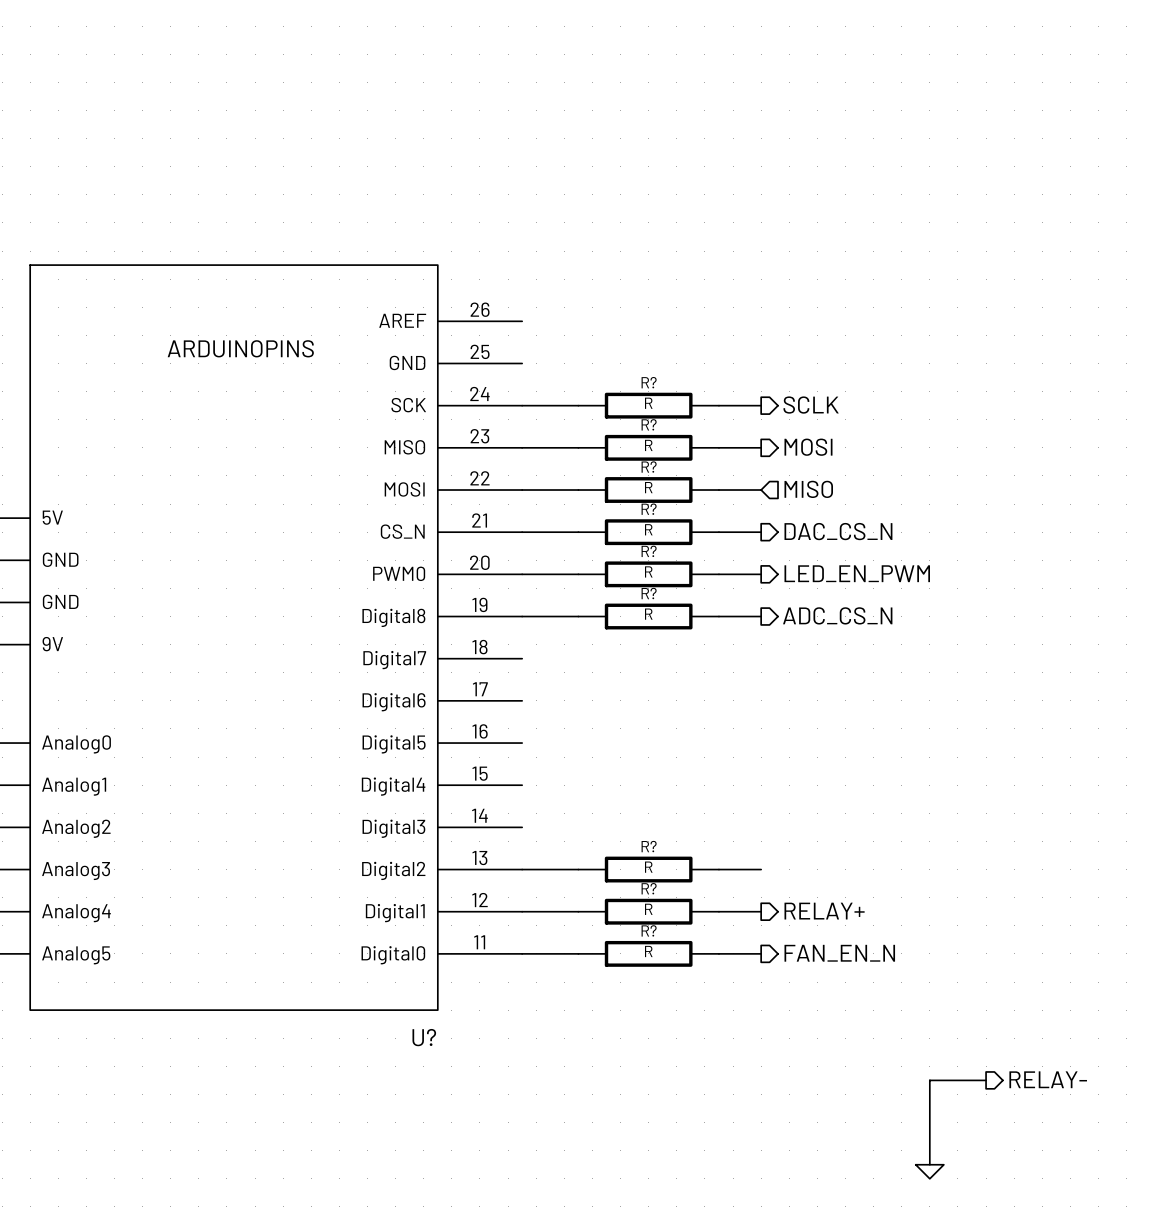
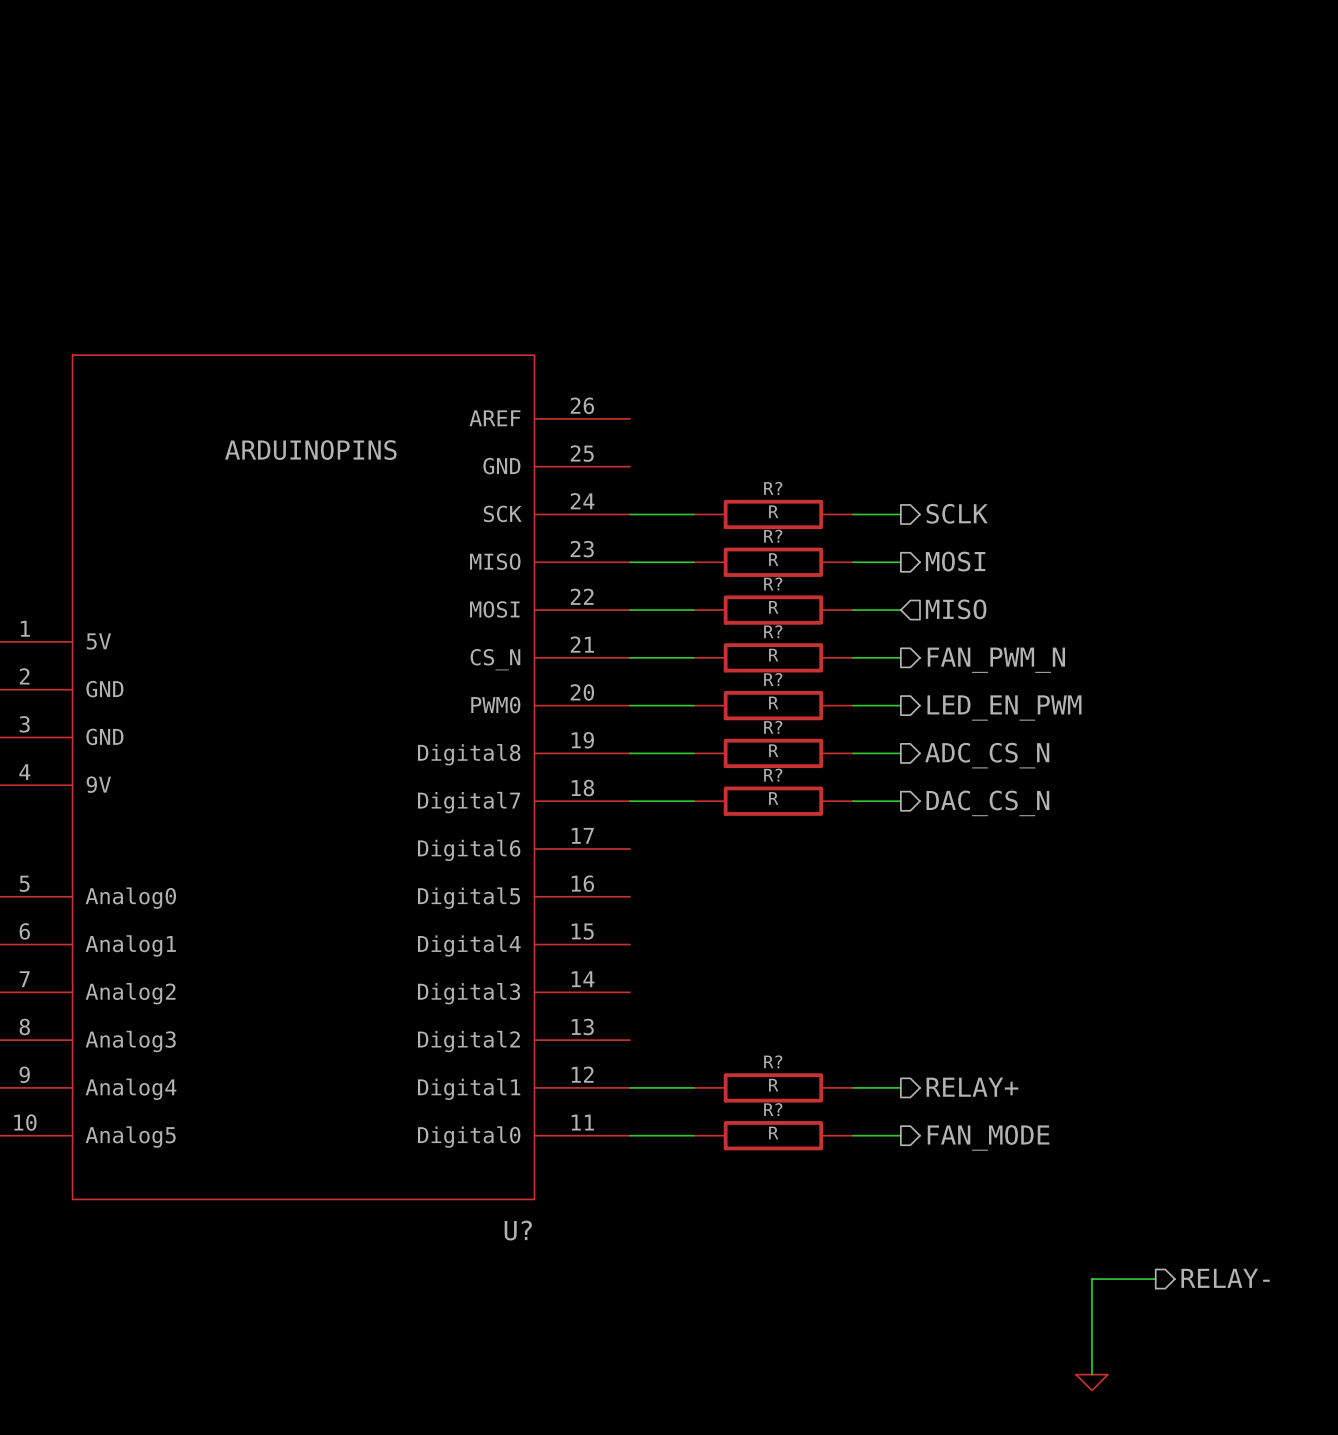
hierarchical label: DAC_CS_N (838, 531) -> FAN_PWM_N (996, 660)
hierarchical label: none -> DAC_CS_N (987, 803)
wire: (522, 869) (578, 869) -> (630, 801) (693, 801)
R? position: (648, 869) -> (773, 801)
wire: (718, 869) (761, 869) -> (853, 801) (900, 801)
hierarchical label: FAN_EN_N (839, 953) -> FAN_MODE (988, 1137)

